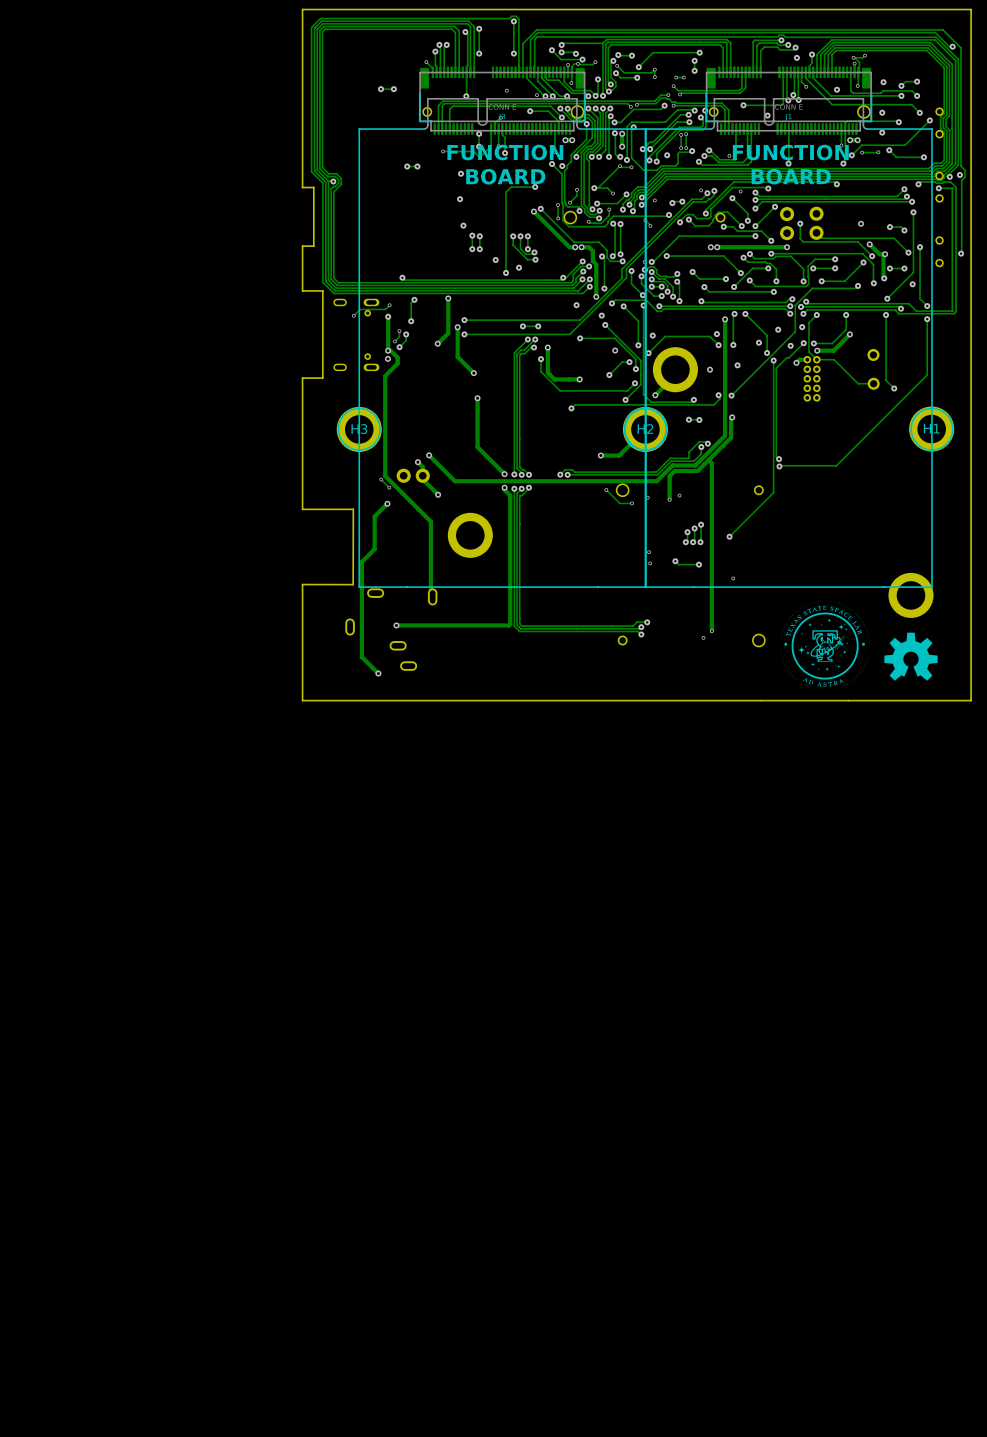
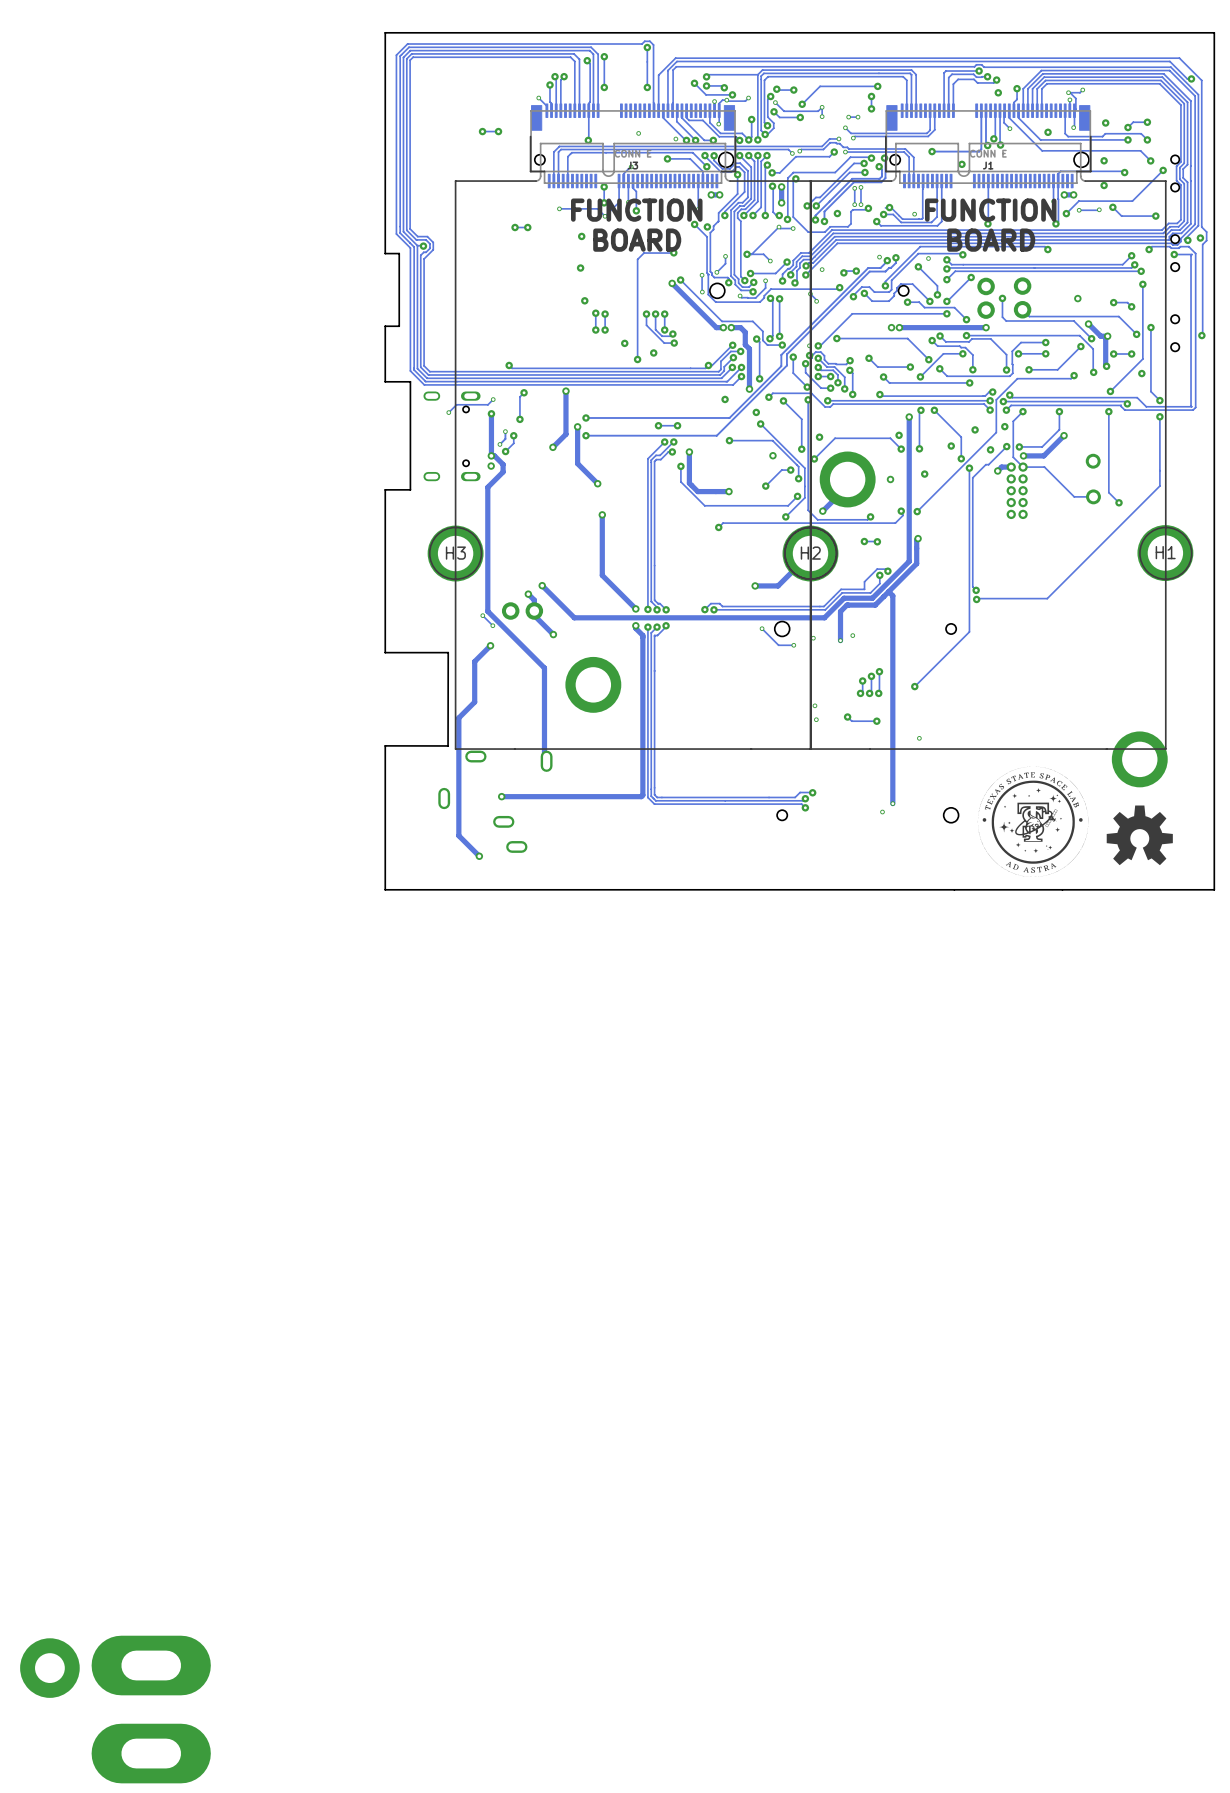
part: none -> (151, 1665)
part: none -> (49, 1668)
part: none -> (151, 1753)

